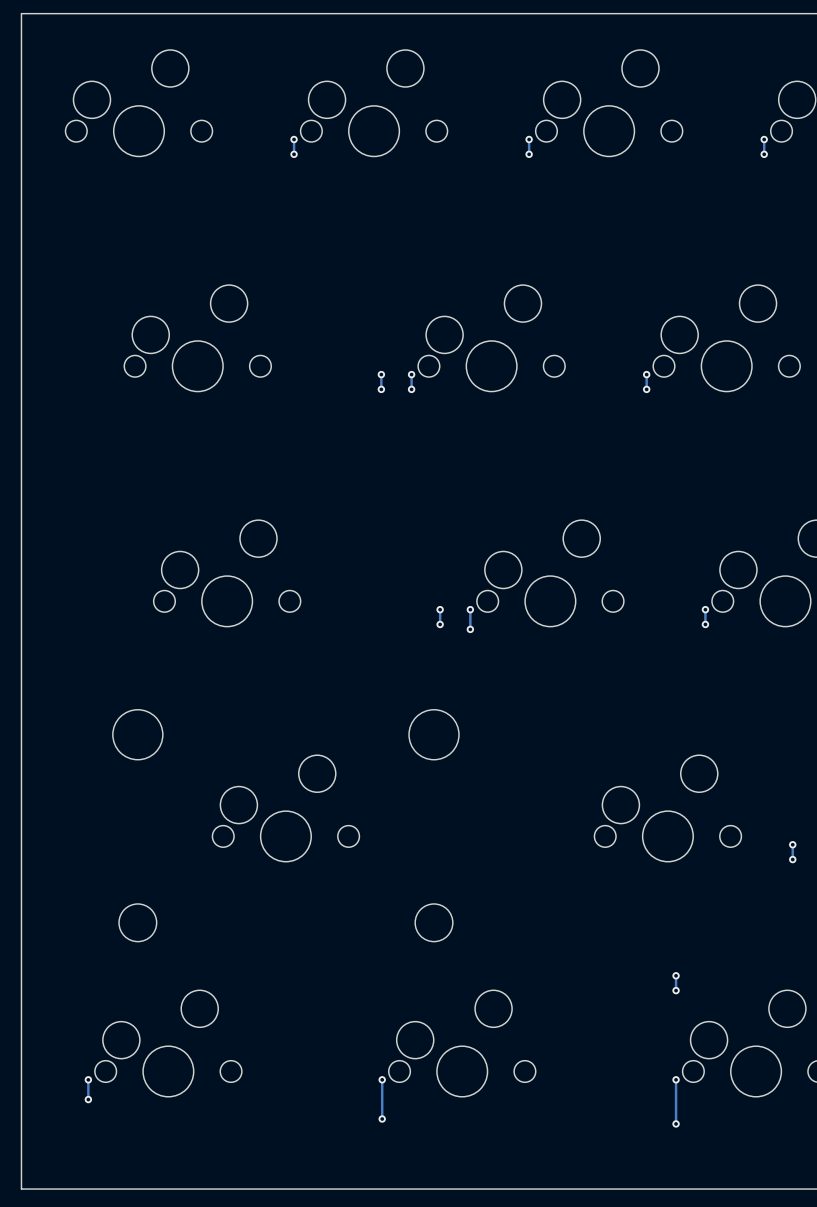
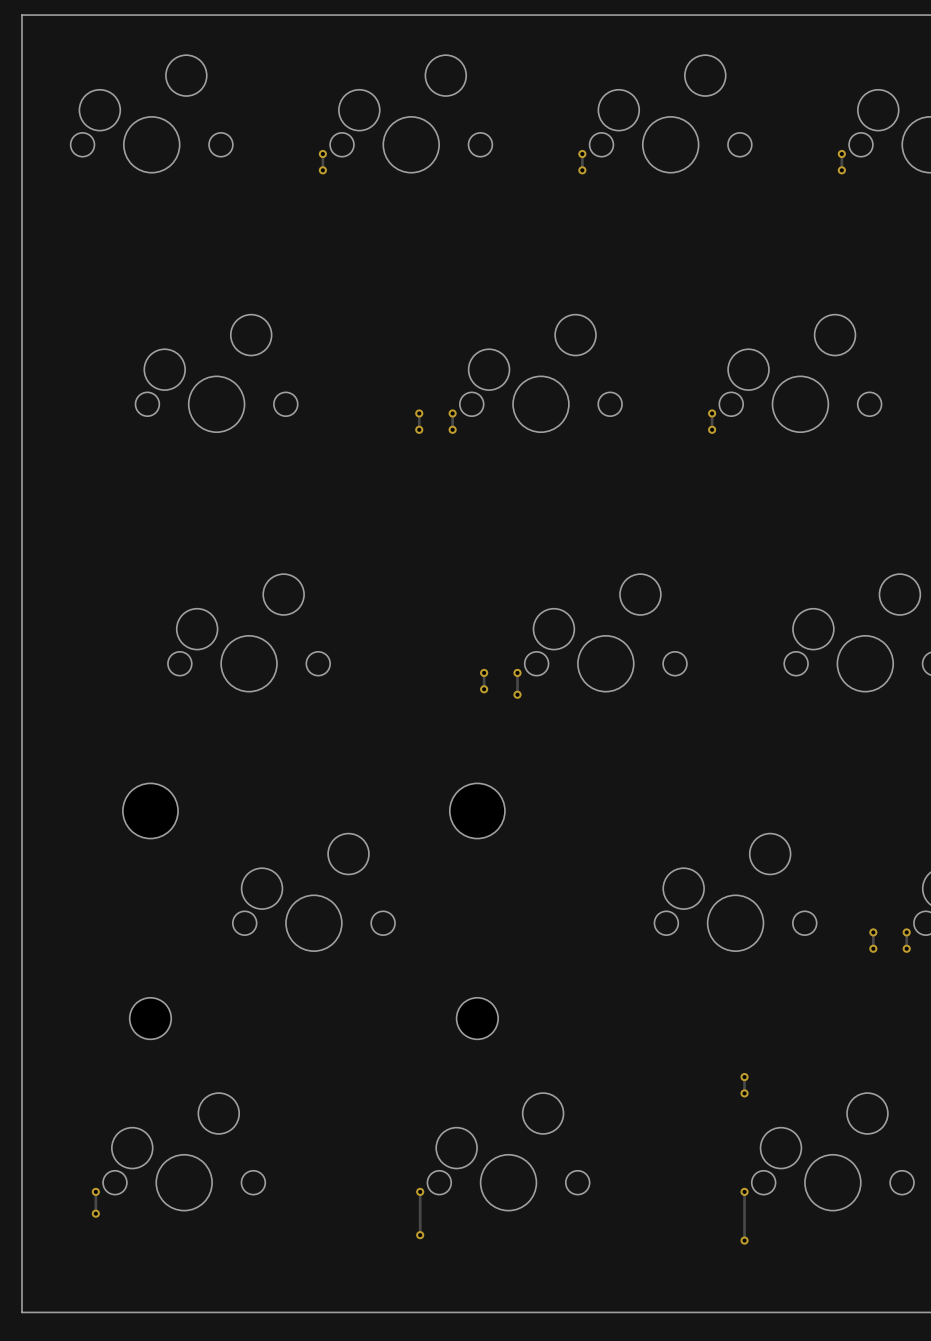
track: (705, 609) (705, 624) -> none
via: (705, 609) -> none
via: (705, 624) -> none

